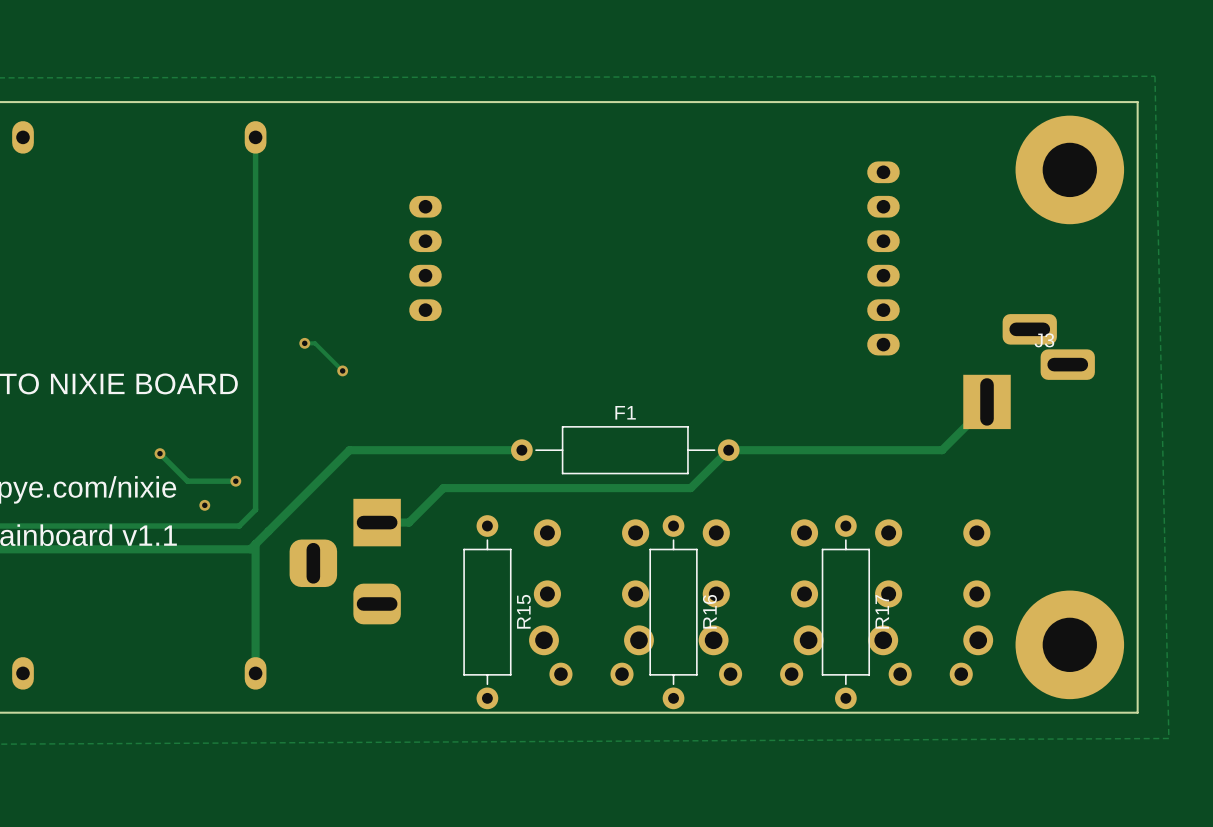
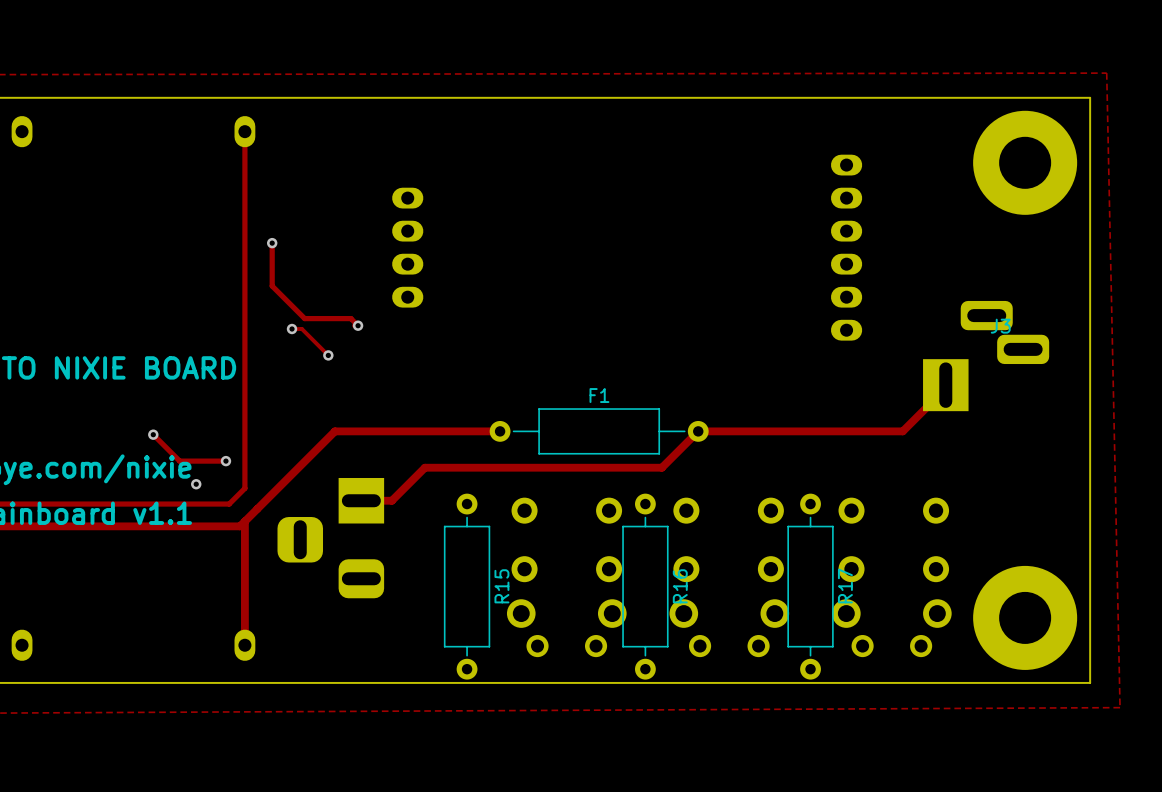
track: none -> (272, 243) (272, 286) (304, 318) (350, 318) (358, 325) (354, 325)
via: none -> (272, 243)
via: none -> (358, 325)

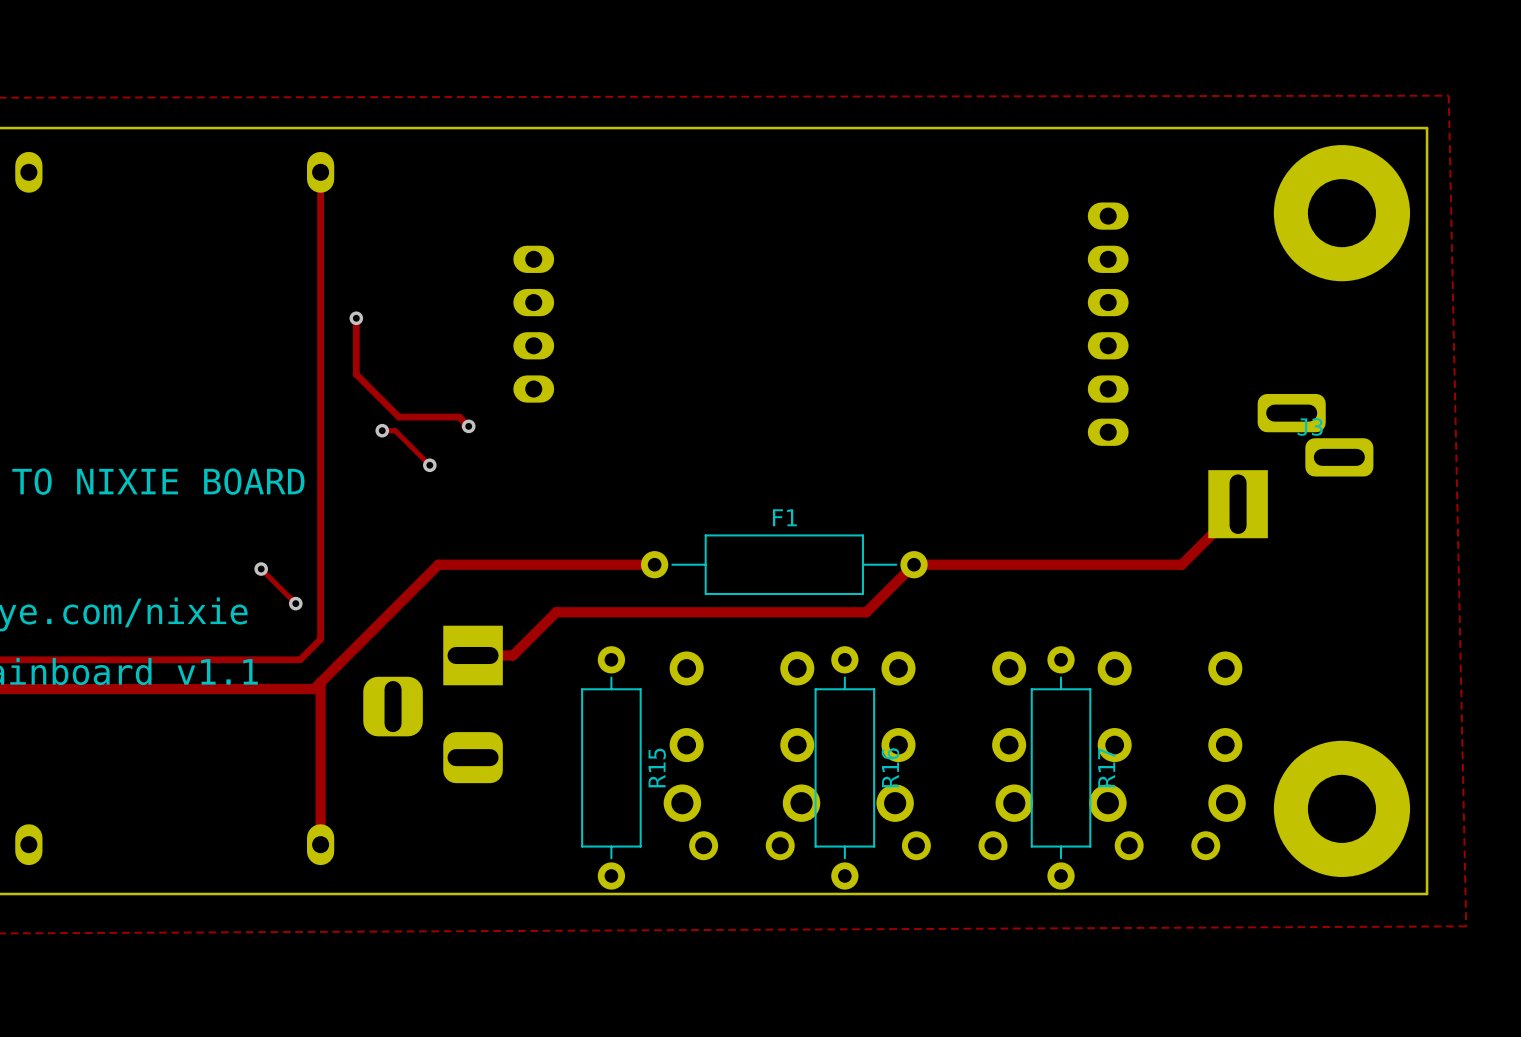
track: (153, 434) (179, 461) (225, 461) -> none
via: (153, 434) -> none
track: none -> (261, 569) (291, 599)
via: none -> (261, 569)
via: (196, 484) -> none

